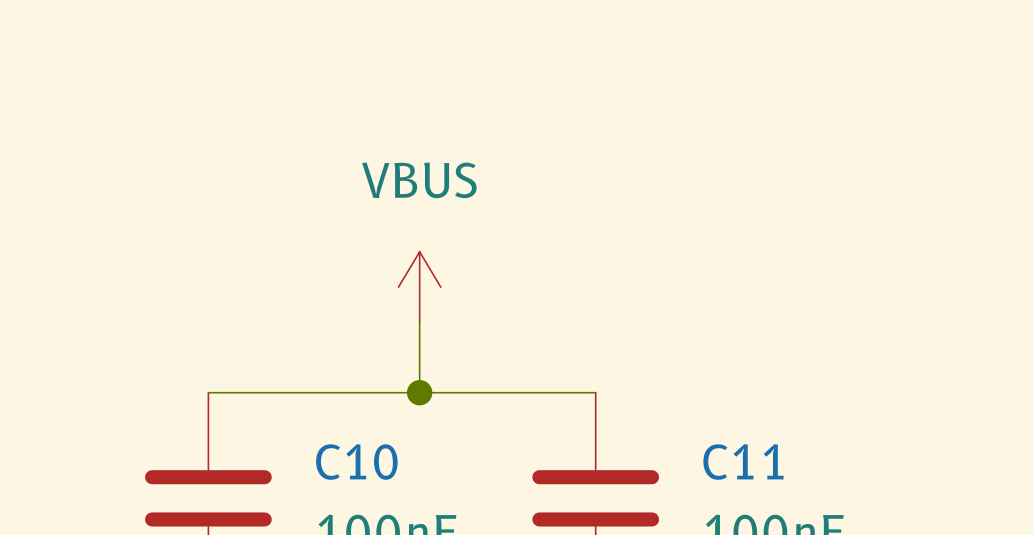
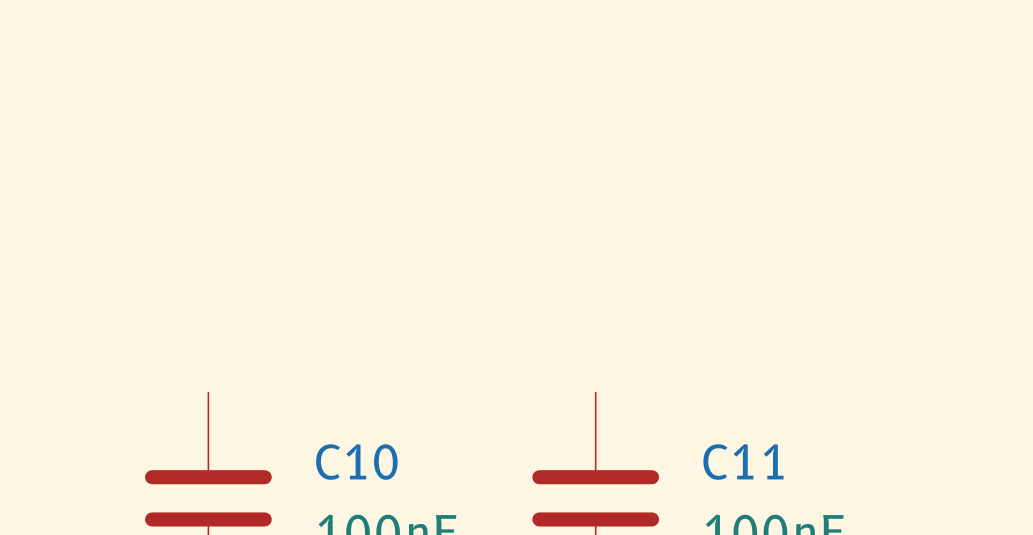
power symbol: VBUS (419, 287) -> none
wire: (419, 322) (419, 392) -> none
wire: (208, 392) (595, 392) -> none
junction: (419, 392) -> none

